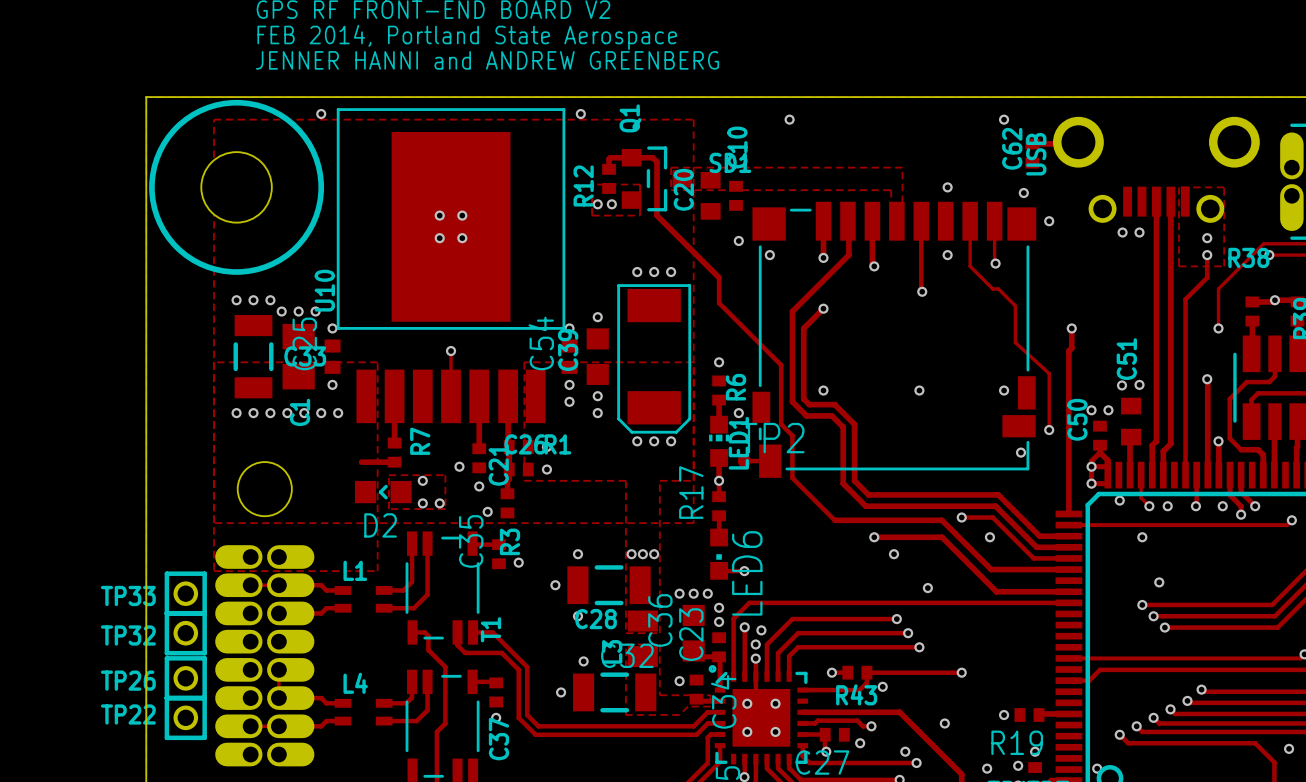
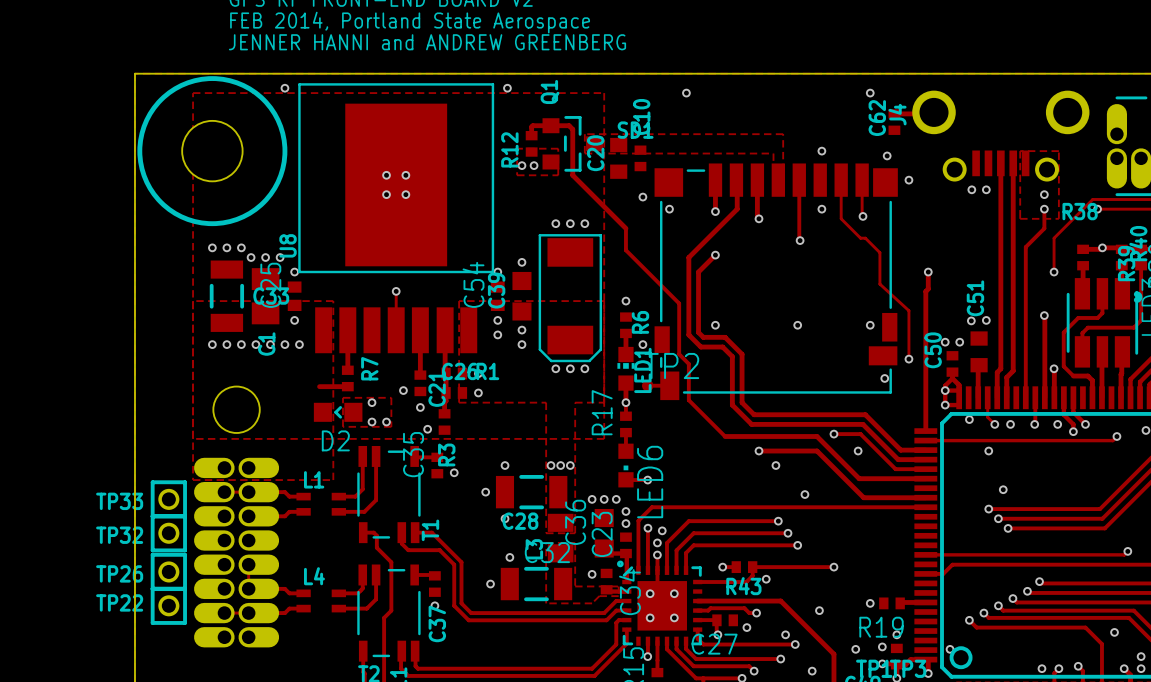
USB name: USB (1036, 154) -> J4 (897, 114)
U10 name: U10 (324, 290) -> U8 (288, 245)

